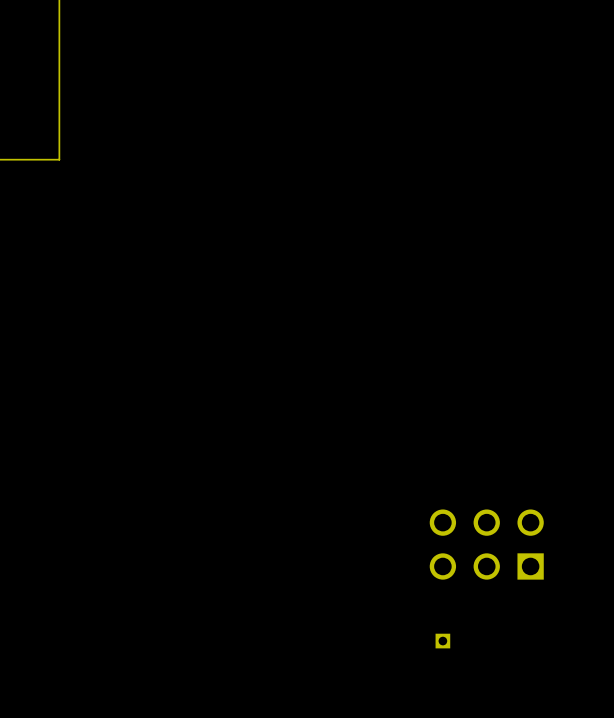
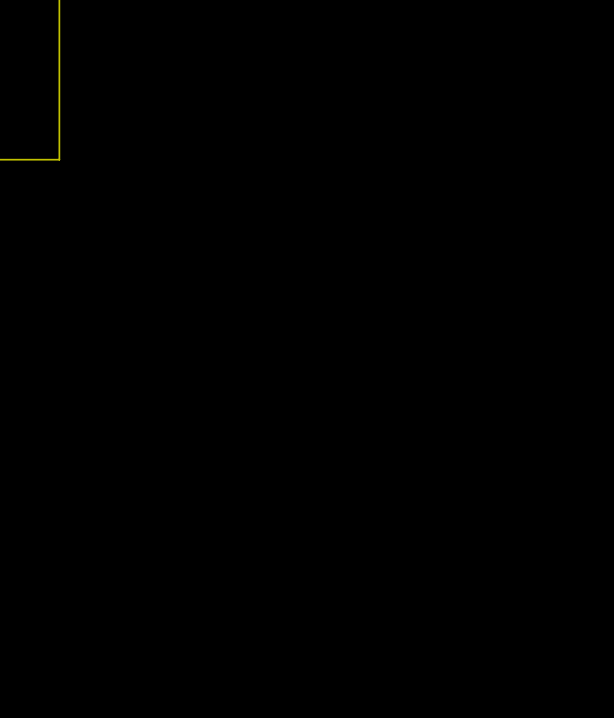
part: (486, 544) -> none
part: (442, 641) -> none

